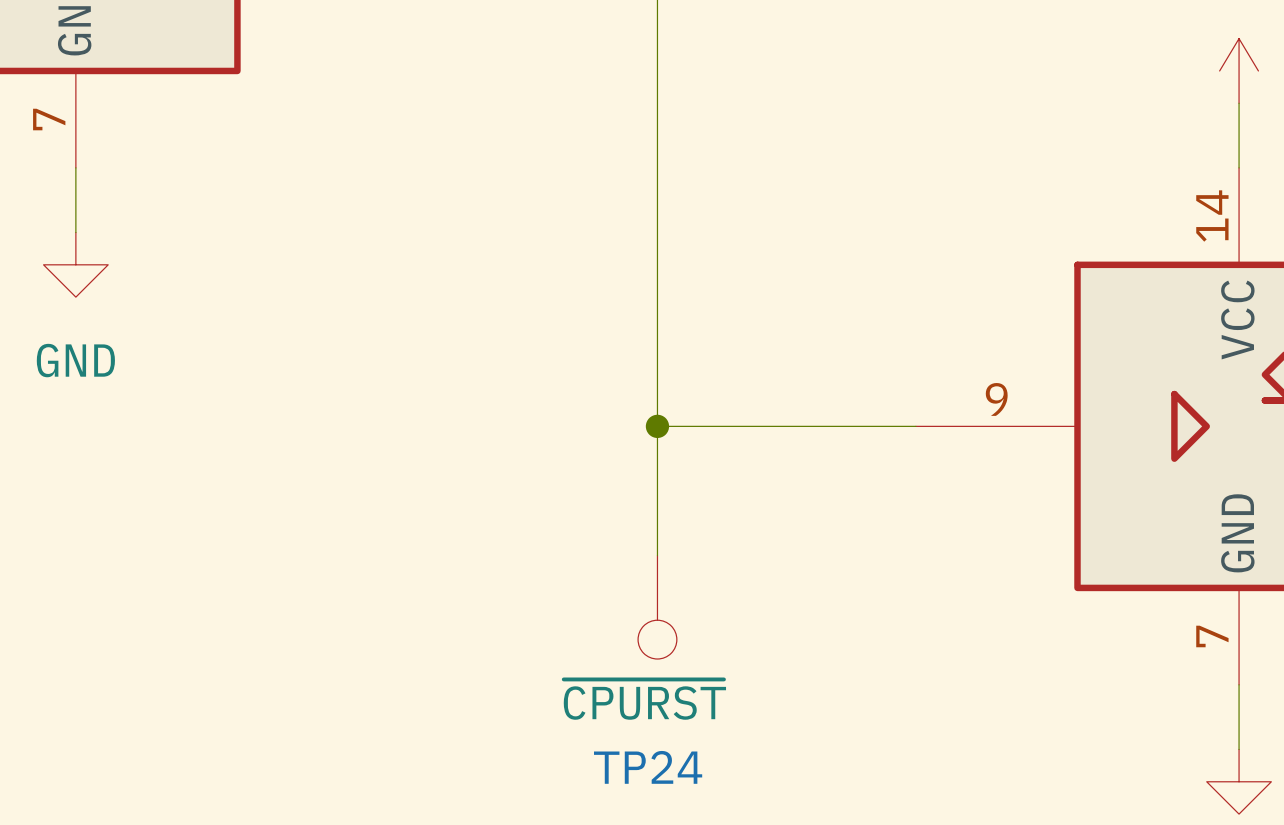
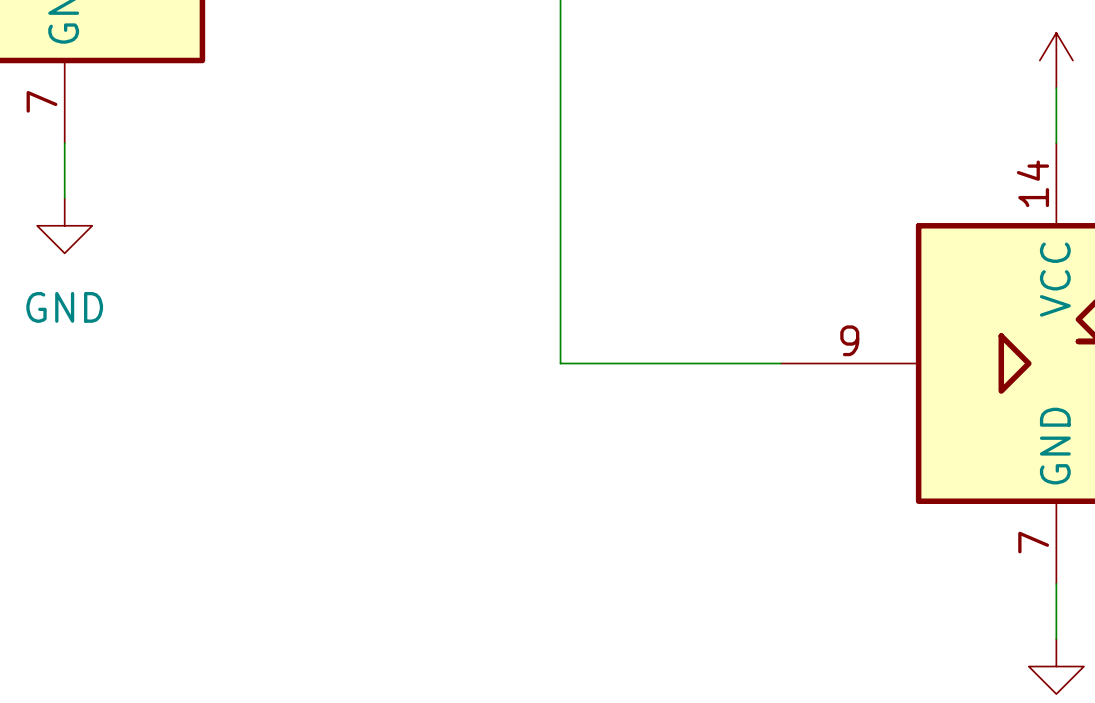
wire: (657, 426) (657, 555) -> none
junction: (657, 426) -> none
TP24: ~{CPURST} (657, 607) -> none

